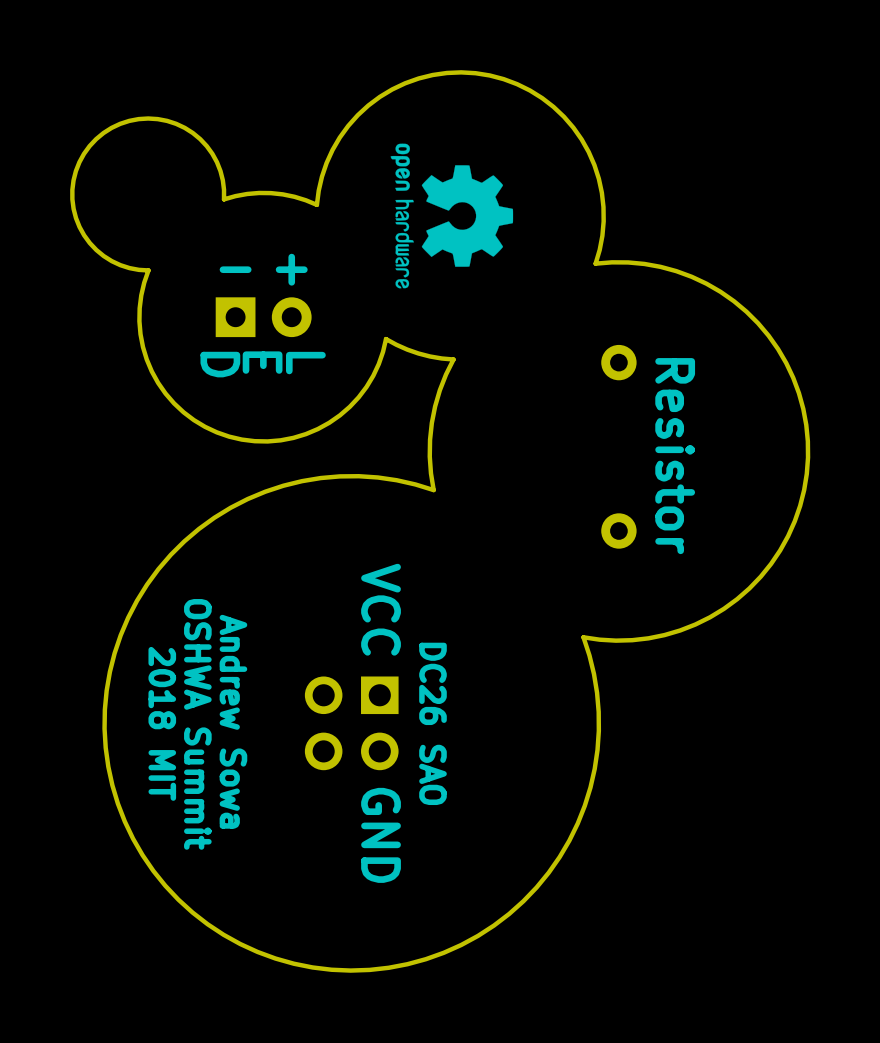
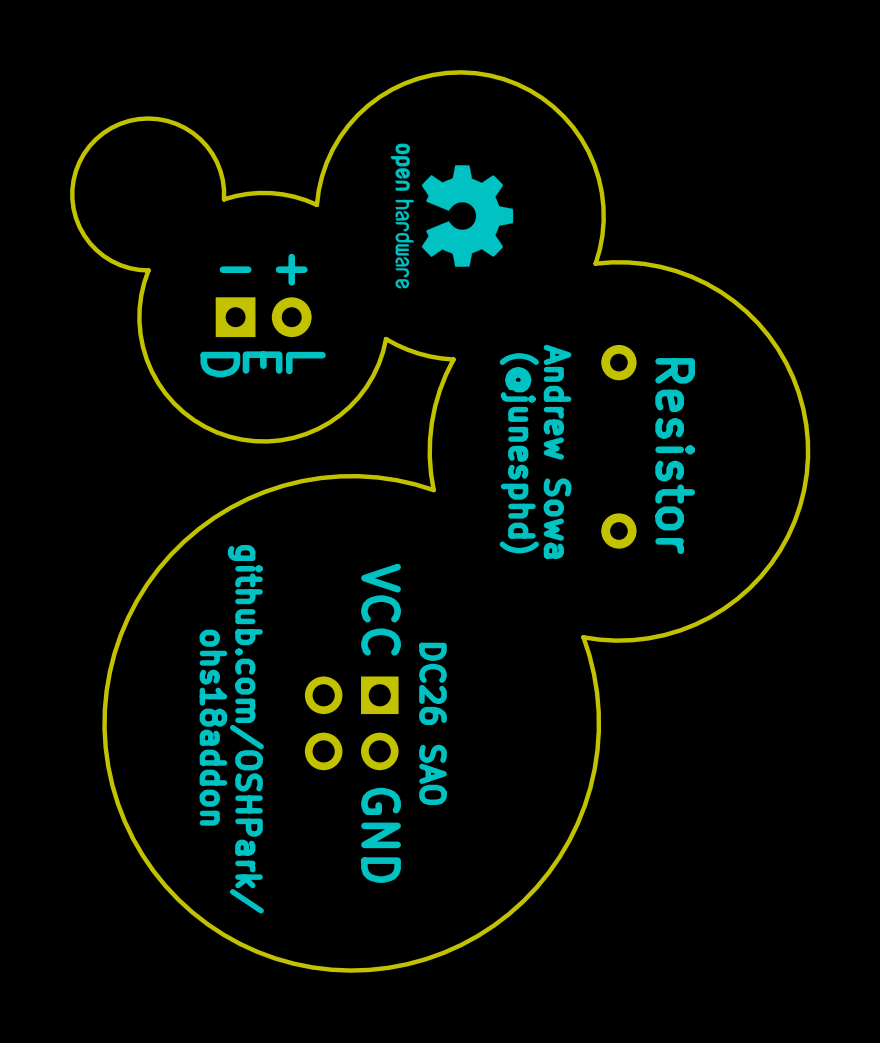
text: none -> (@junesphd) (519, 453)
text position: Andrew Sowa (233, 721) -> Andrew Sowa (557, 451)
text: 2018 MIT (162, 723) -> none
text: OSHWA Summit (197, 724) -> ohs18addon (213, 727)
text: none -> github.com/OSHPark/ (245, 729)

